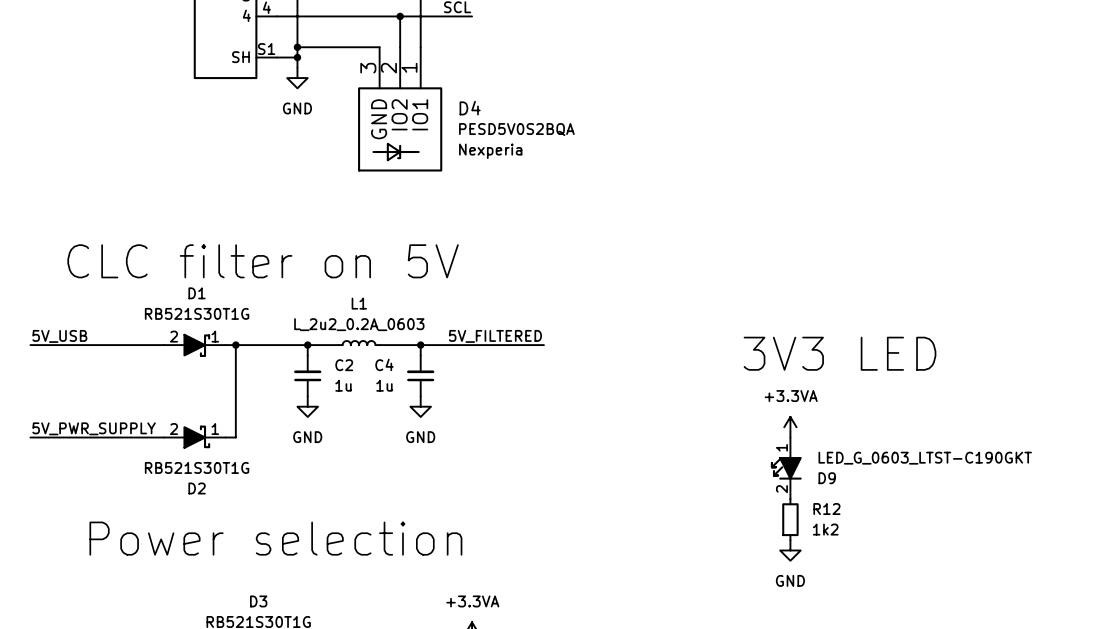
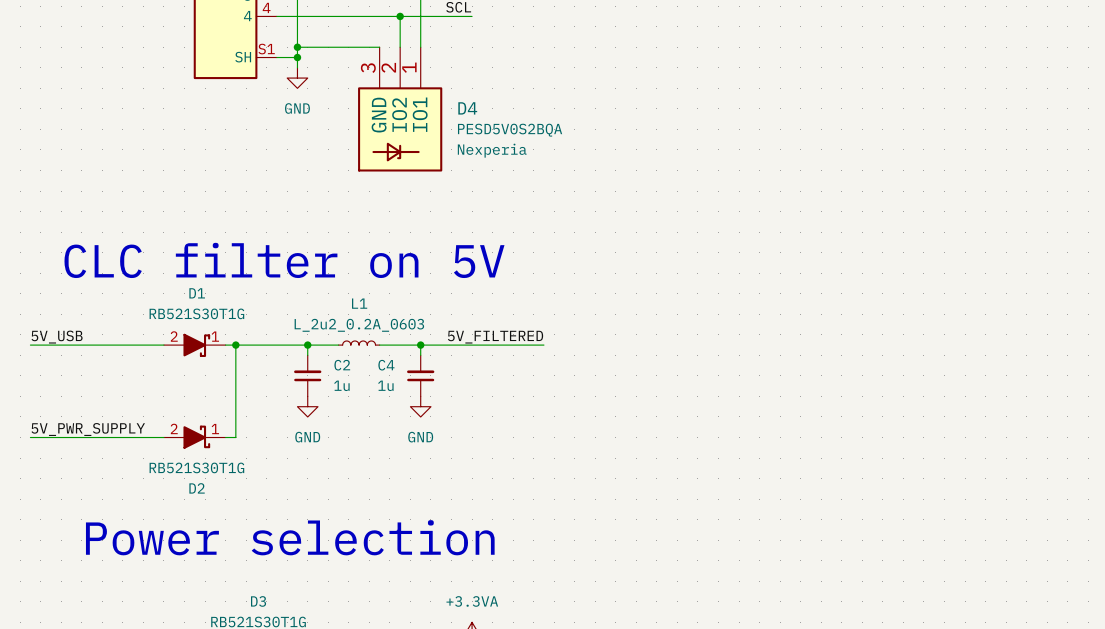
text: 3V3 LED (840, 353) -> none
power symbol: +3.3VA (790, 427) -> none
D9: LED_G_0603_LTST-C190GKT (786, 468) -> none
R12: (790, 519) -> none
power symbol: GND (790, 550) -> none

